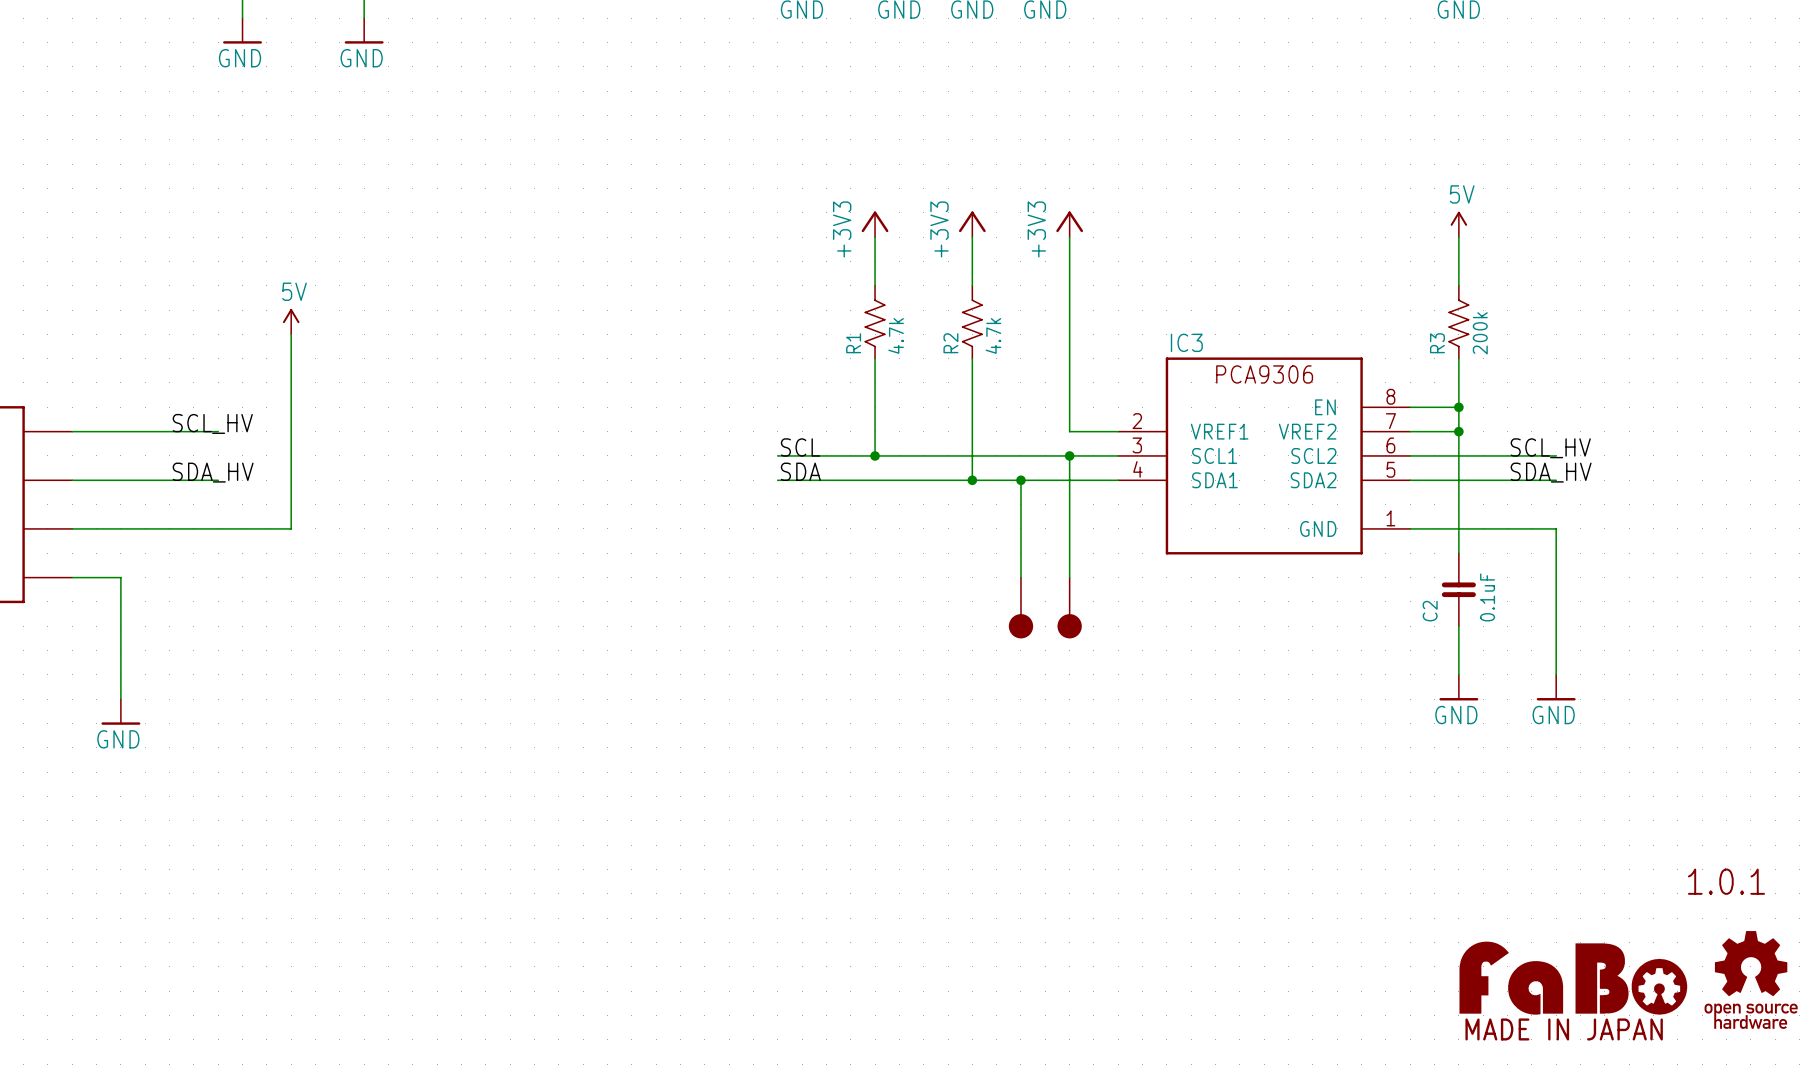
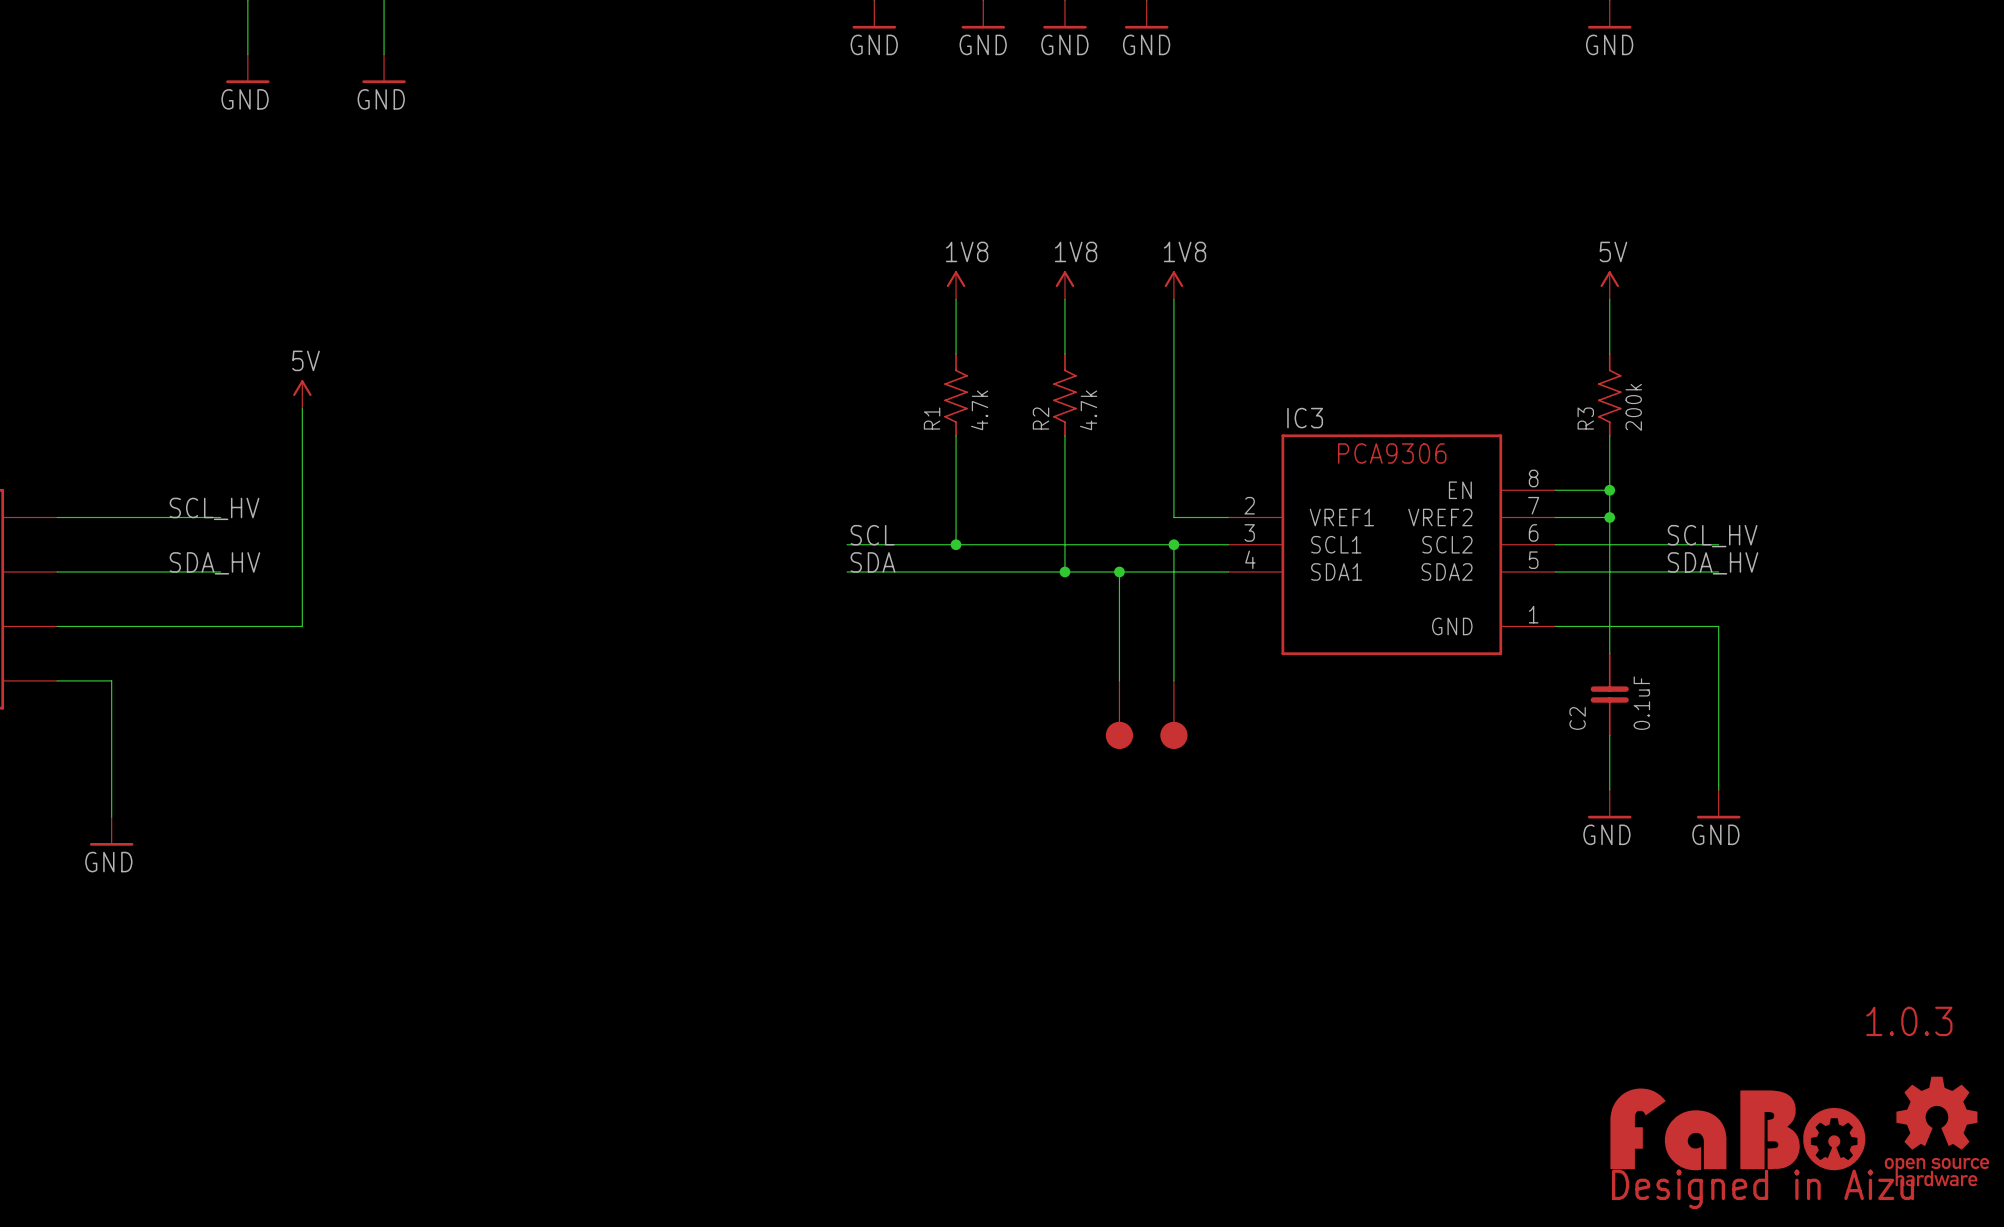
power symbol: +3V3 (875, 224) -> 1V8 (956, 285)
power symbol: +3V3 (972, 224) -> 1V8 (1064, 285)
power symbol: +3V3 (1069, 224) -> 1V8 (1173, 285)
text: 1.0.1 (1726, 881) -> 1.0.3 (1909, 1021)
part text: MADE IN JAPAN (1564, 1029) -> none
part text: none -> Designed in Aizu (1763, 1189)

